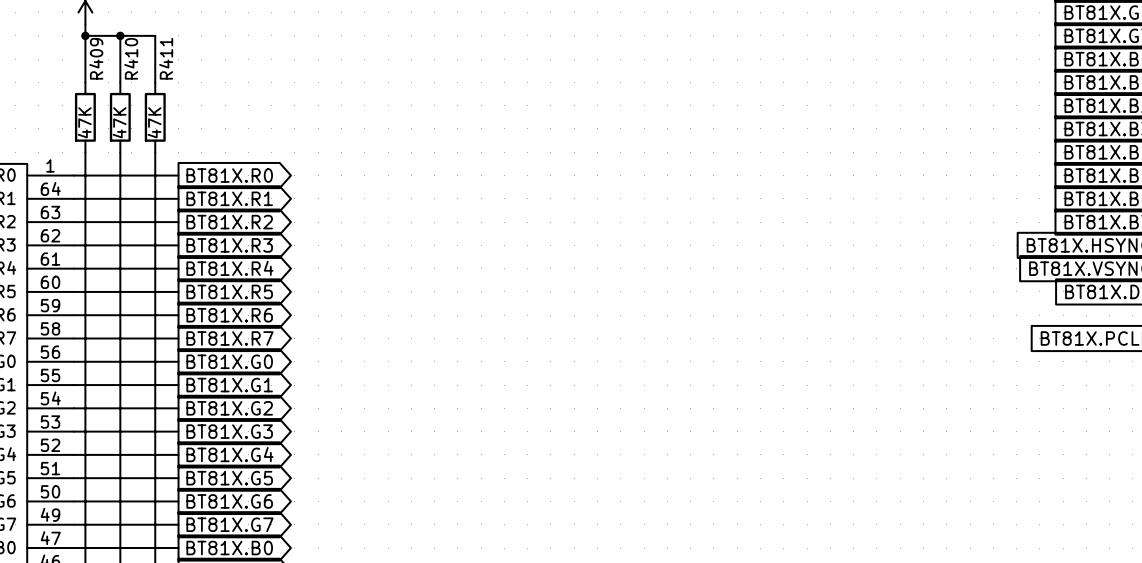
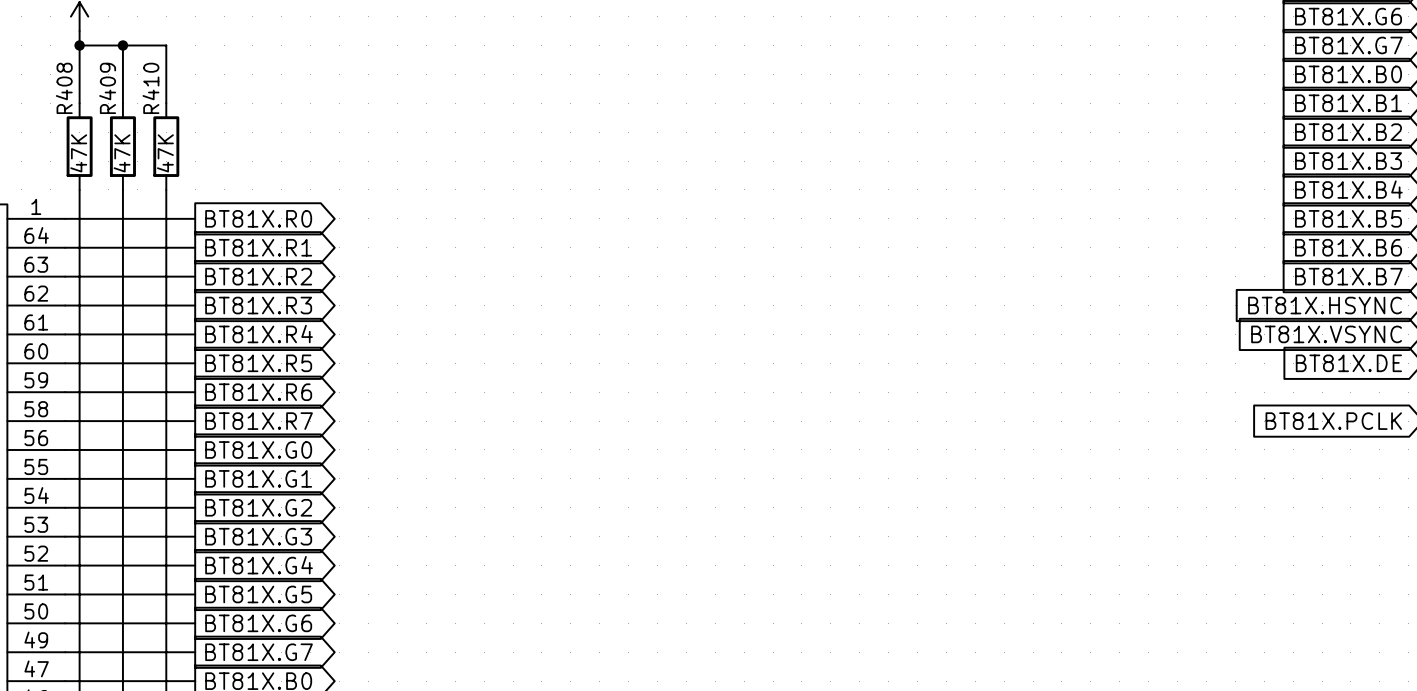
R409 name: R409 (96, 58) -> R408 (64, 88)
R410 name: R410 (131, 58) -> R409 (107, 88)
R411 name: R411 (166, 58) -> R410 (150, 88)

